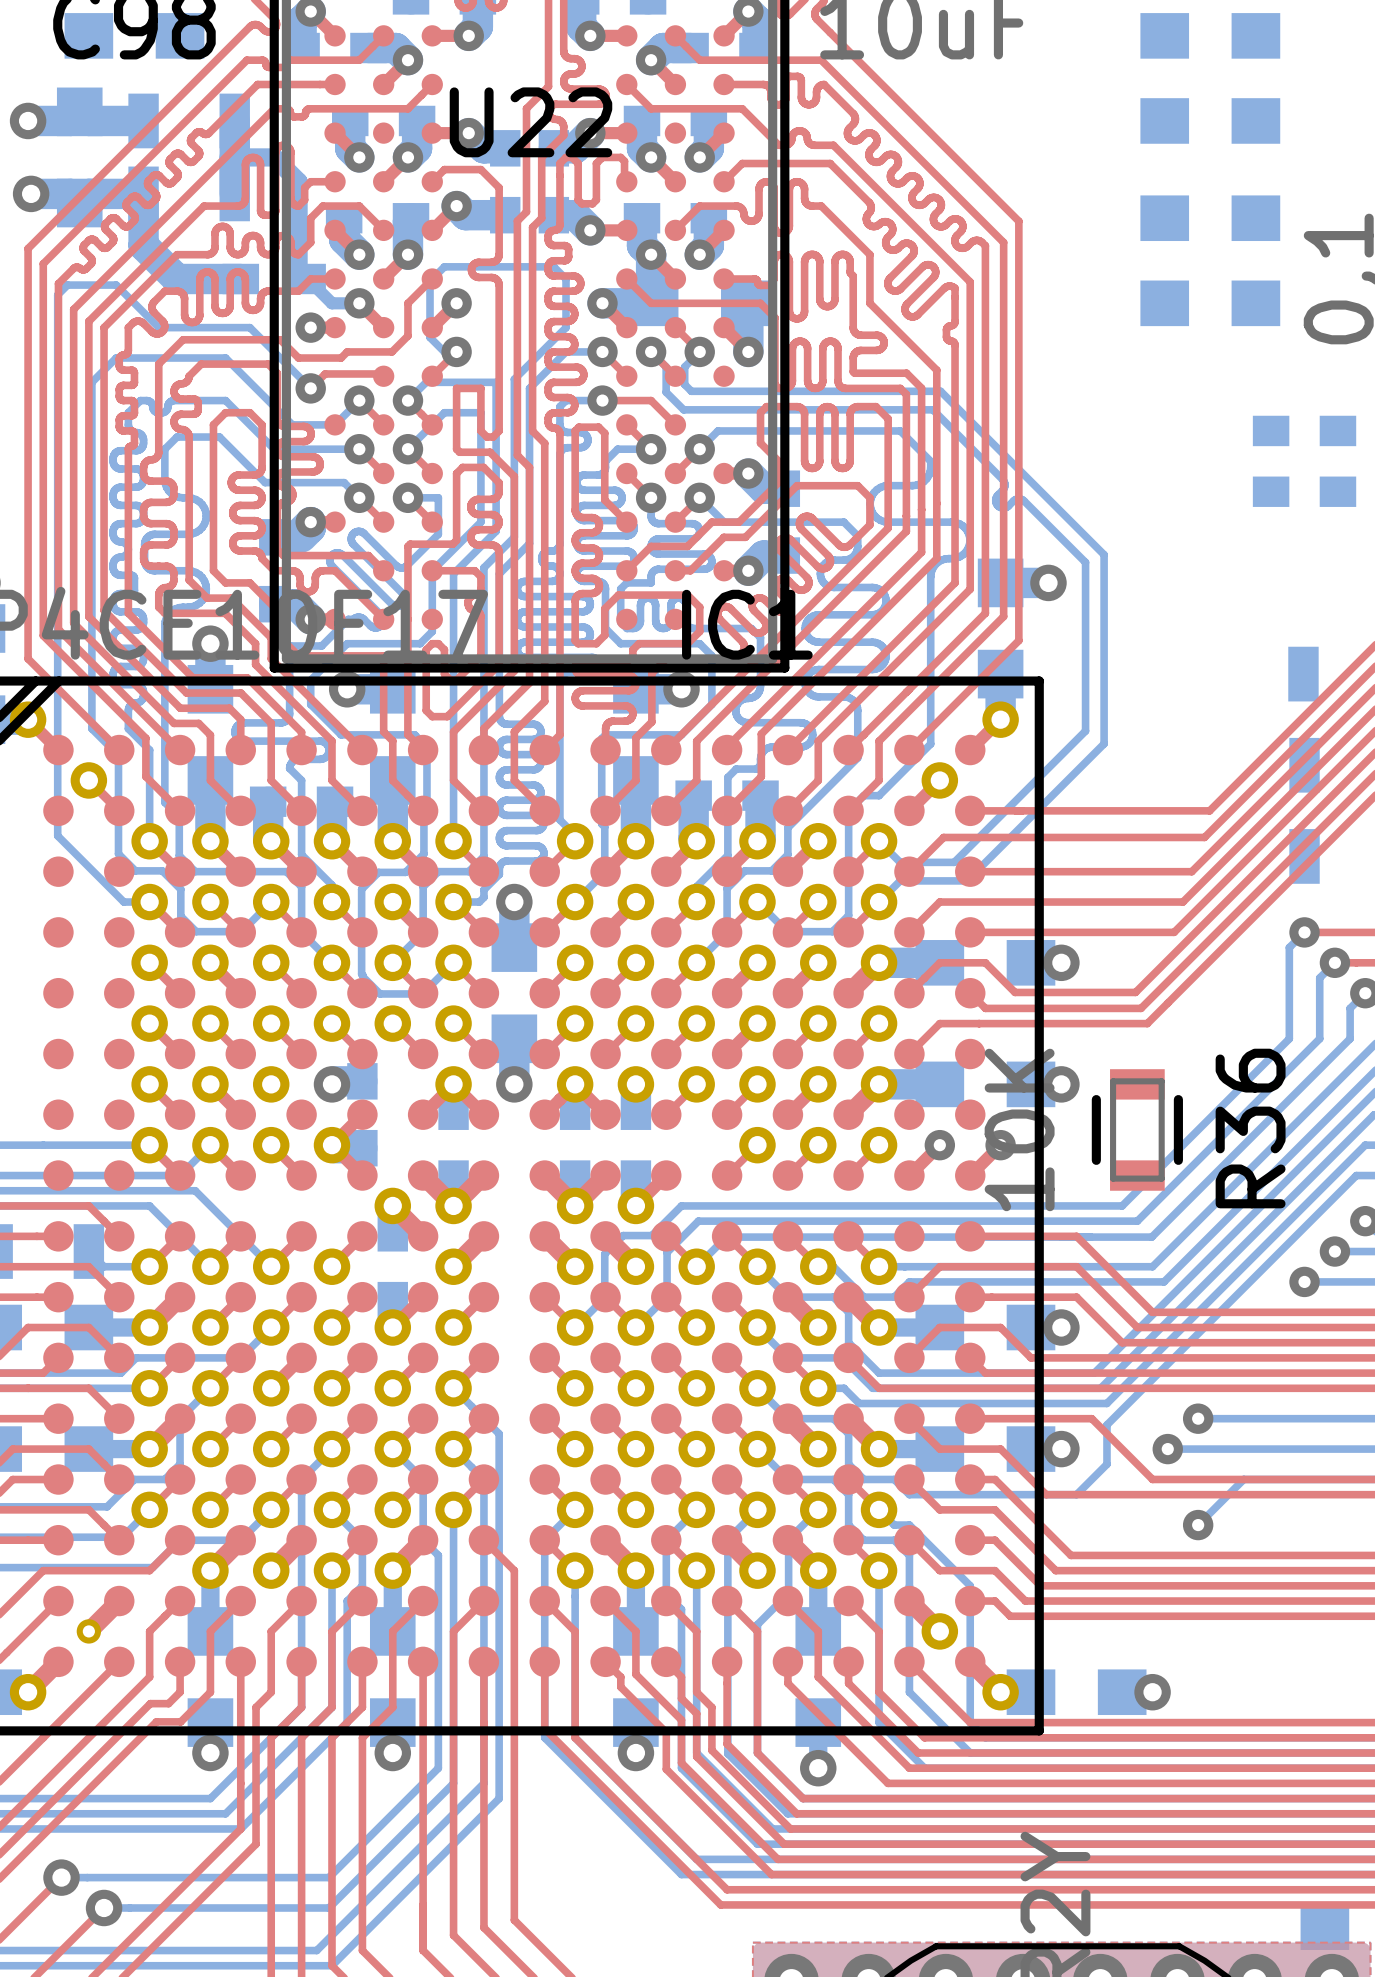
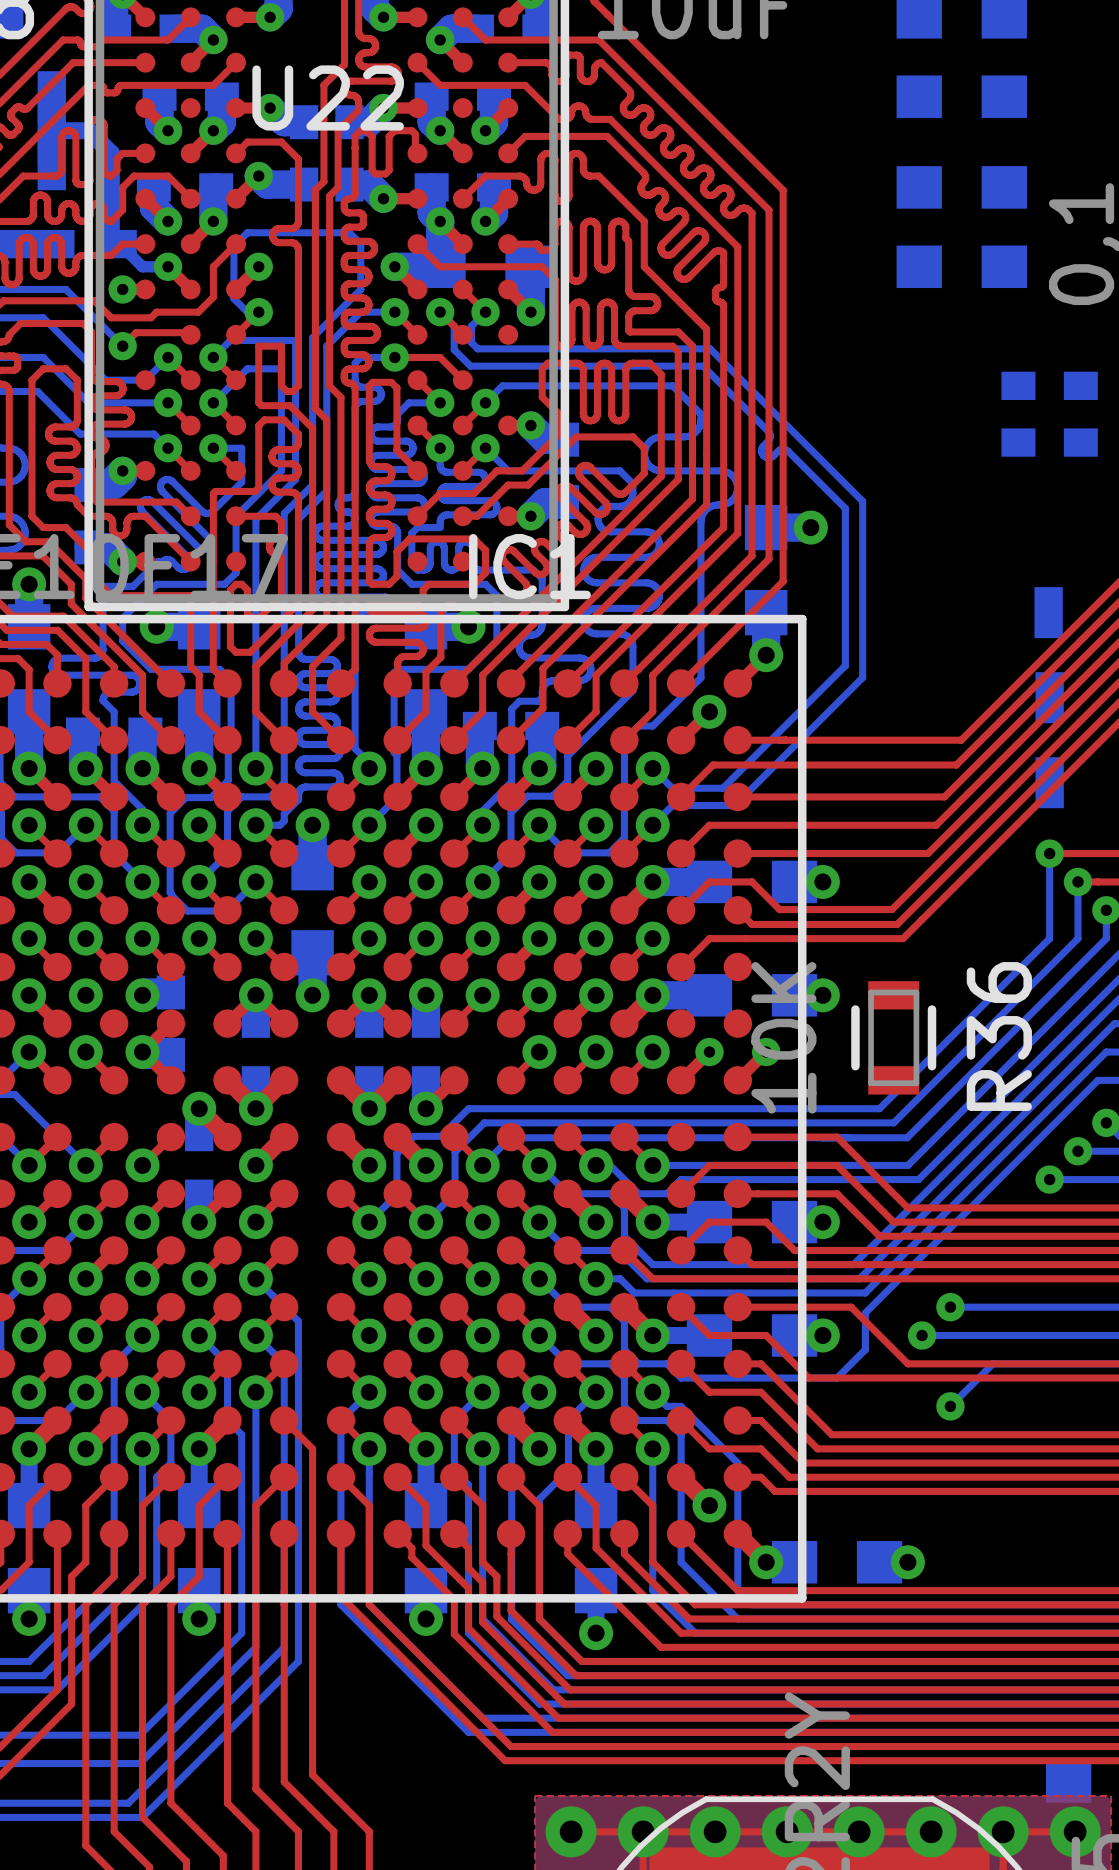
bottom track: (1304, 932) (1289, 947) (1289, 1038) -> (1049, 853) (1049, 938) (1035, 952)
bottom track: (1334, 962) (1319, 978) (1319, 1038) -> (1078, 881) (1078, 938) (1063, 952)
bottom track: (1365, 993) (1350, 1008) (1350, 1038) -> (1106, 910) (1106, 938) (1092, 952)

